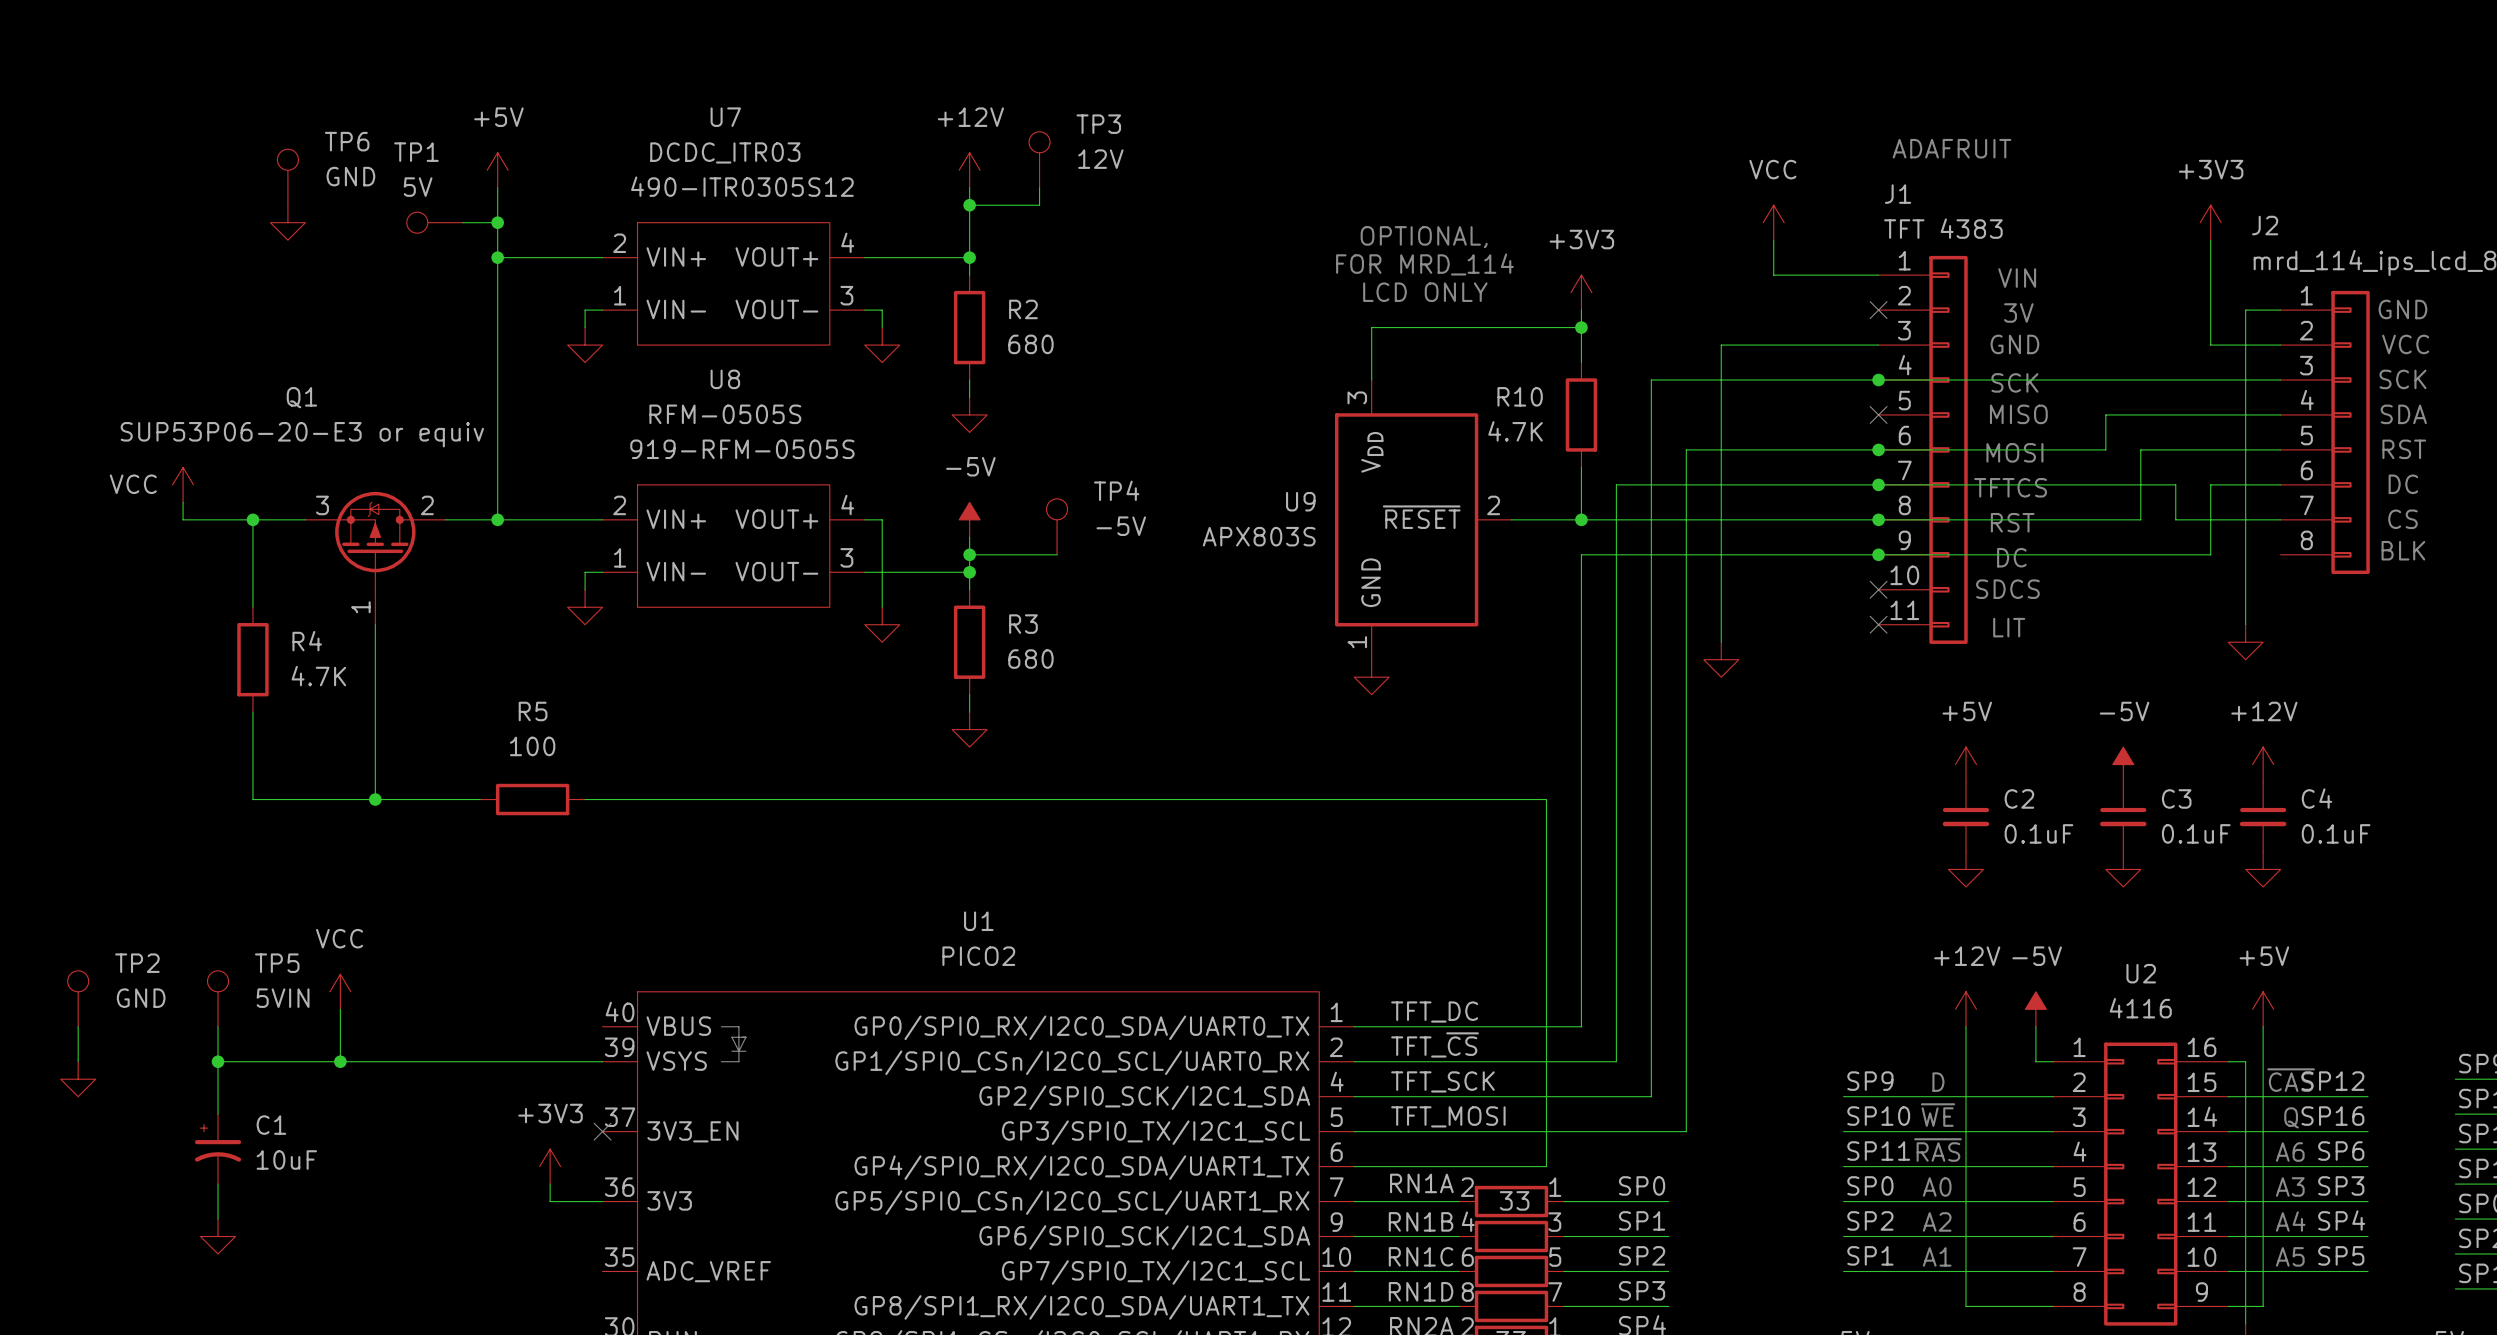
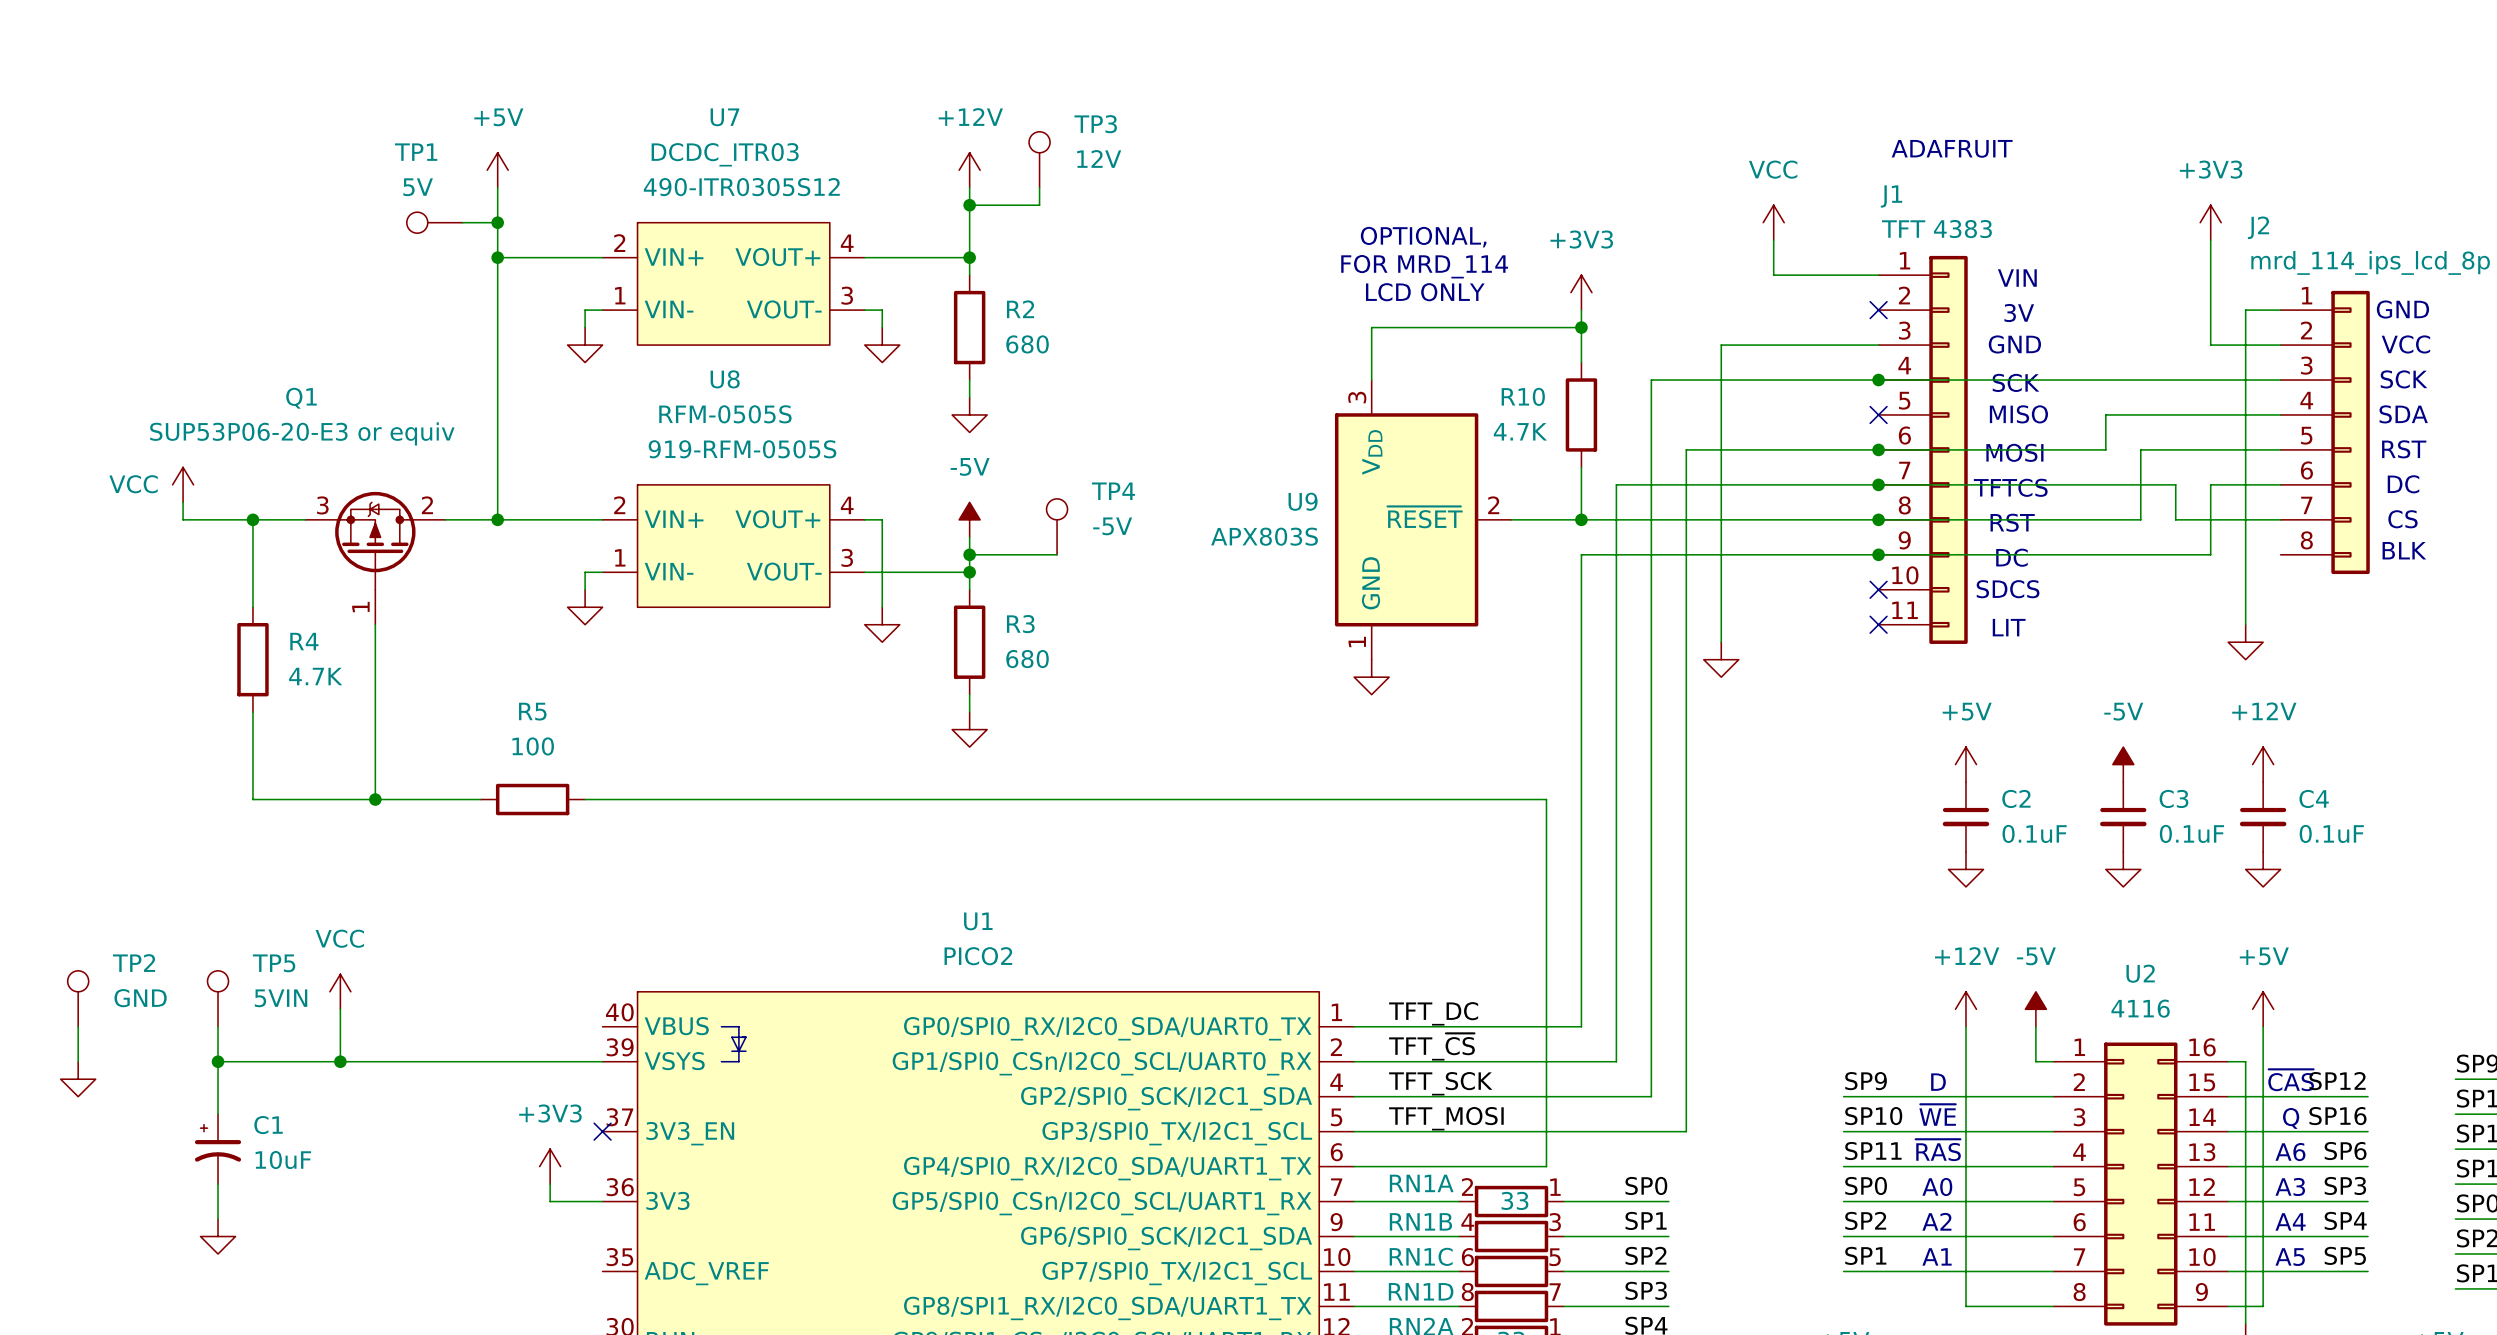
TP6: GND (287, 177) -> none
power symbol: (287, 222) -> none

